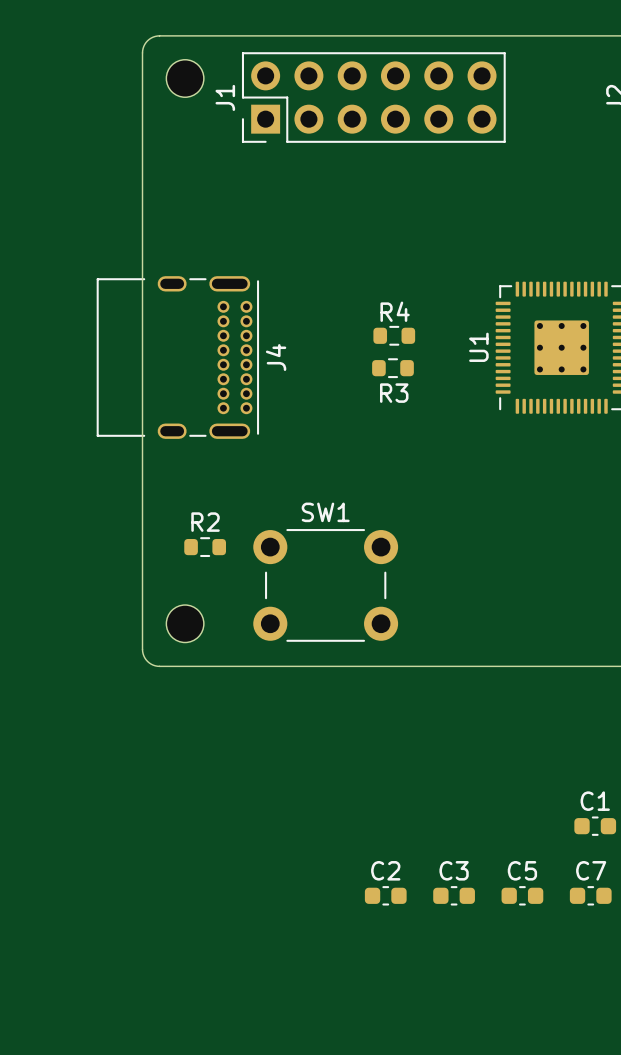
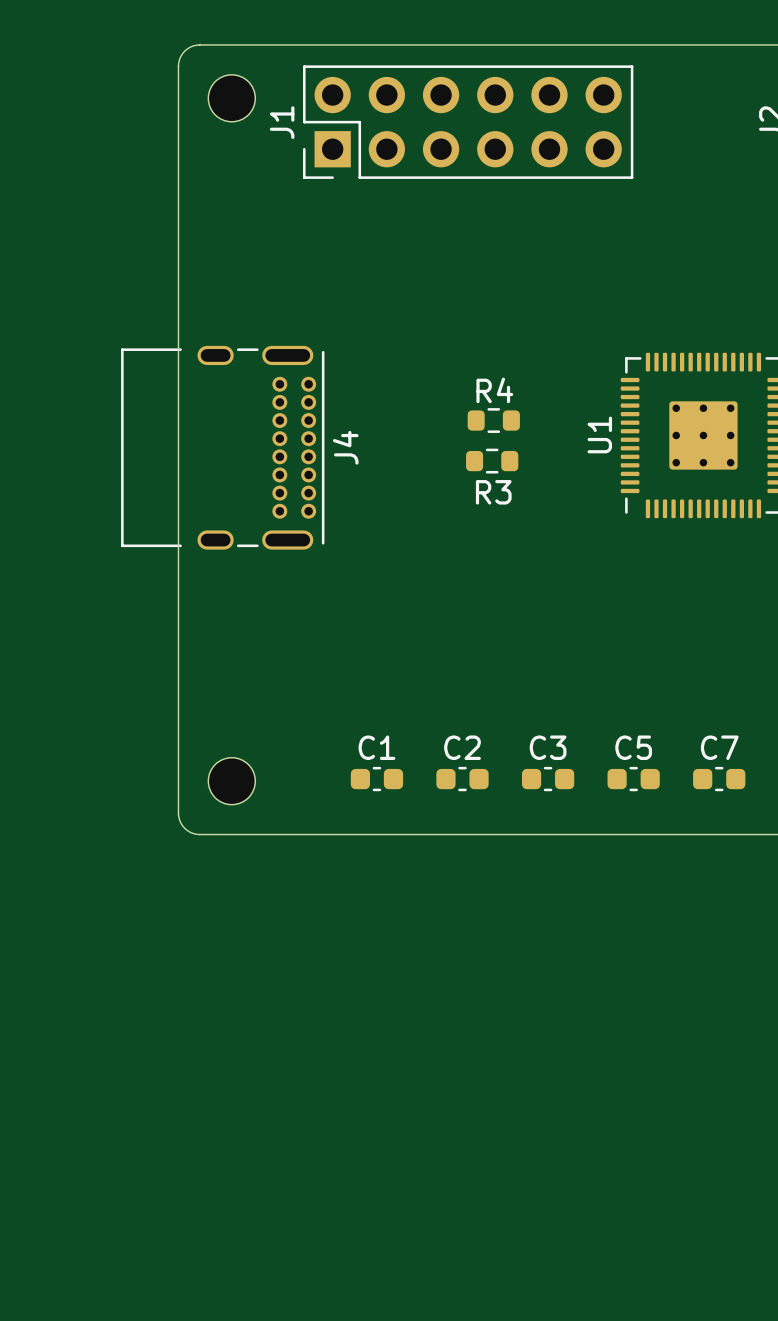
R2: (205, 547) -> none
SW1: (325, 585) -> none
C1 position: (595, 826) -> (376, 779)
C2 position: (385, 895) -> (462, 779)
C3 position: (454, 895) -> (548, 779)
C5 position: (522, 895) -> (633, 779)
C7 position: (590, 895) -> (719, 779)

